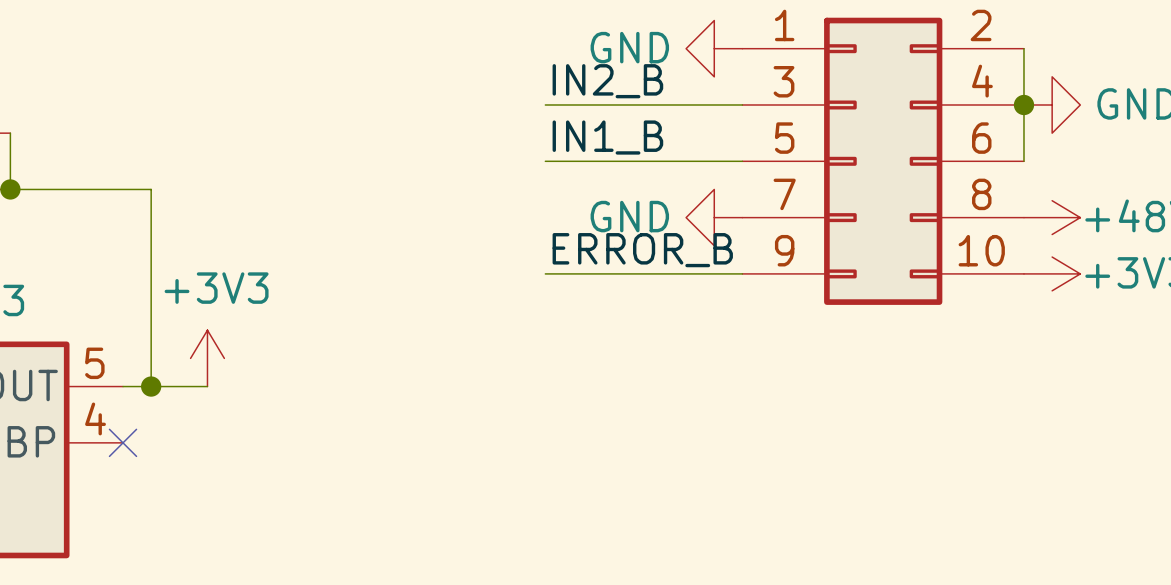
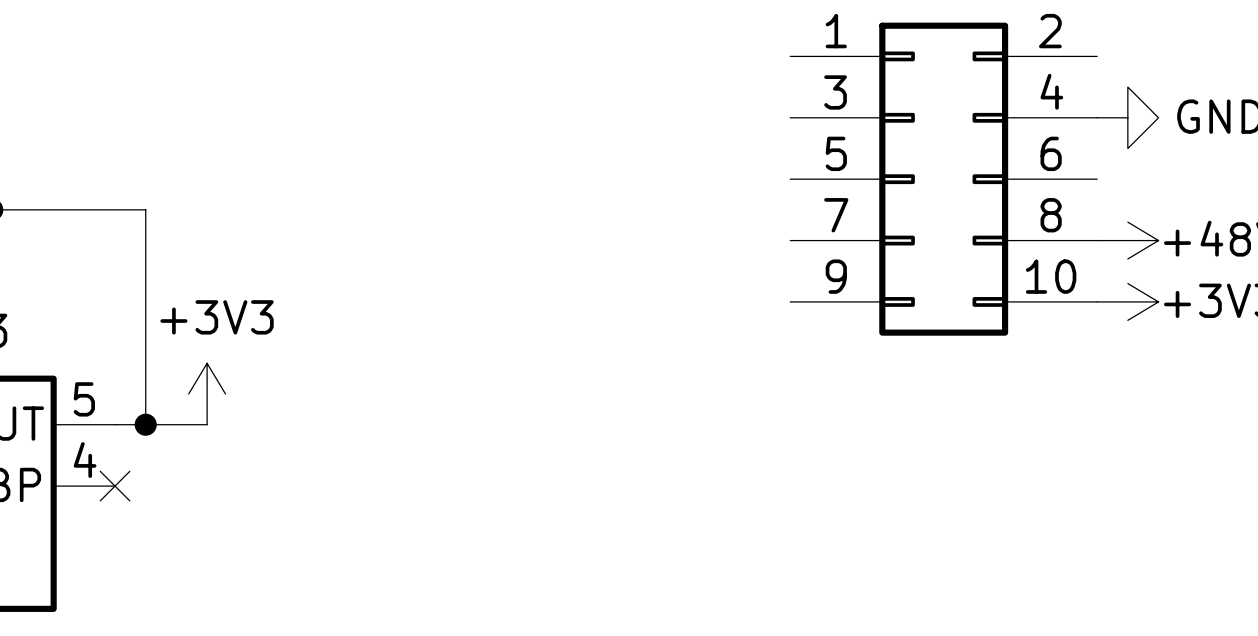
power symbol: GND (714, 48) -> none
wire: (1023, 48) (1023, 161) -> none
label: IN2_B (607, 81) -> none
wire: (545, 104) (742, 104) -> none
junction: (1023, 104) -> none
label: IN1_B (607, 137) -> none
wire: (545, 161) (742, 161) -> none
power symbol: GND (714, 217) -> none
label: ERROR_B (642, 250) -> none
wire: (545, 273) (742, 273) -> none

